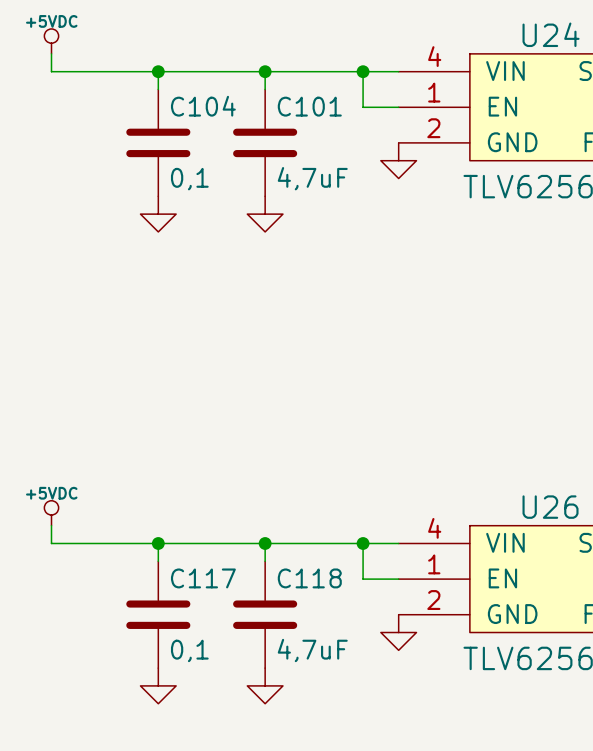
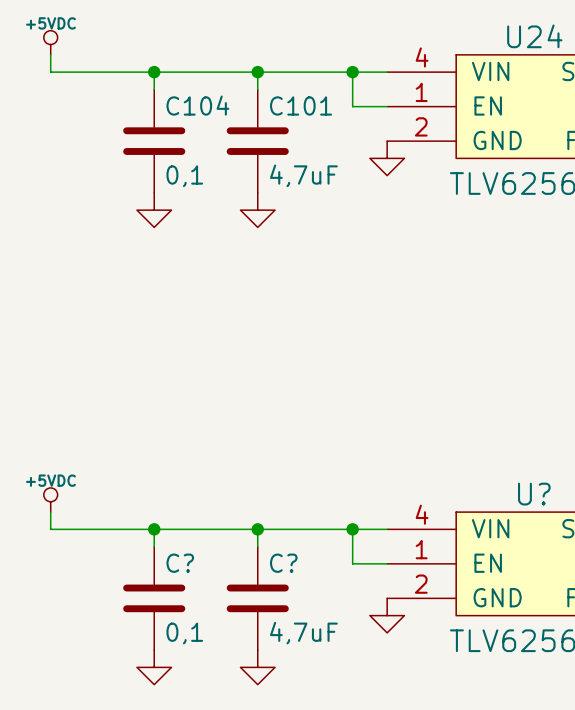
U26 name: U26 (550, 507) -> U? (534, 494)
C117 name: C117 (203, 578) -> C? (180, 563)
C118 name: C118 (309, 578) -> C? (283, 563)

